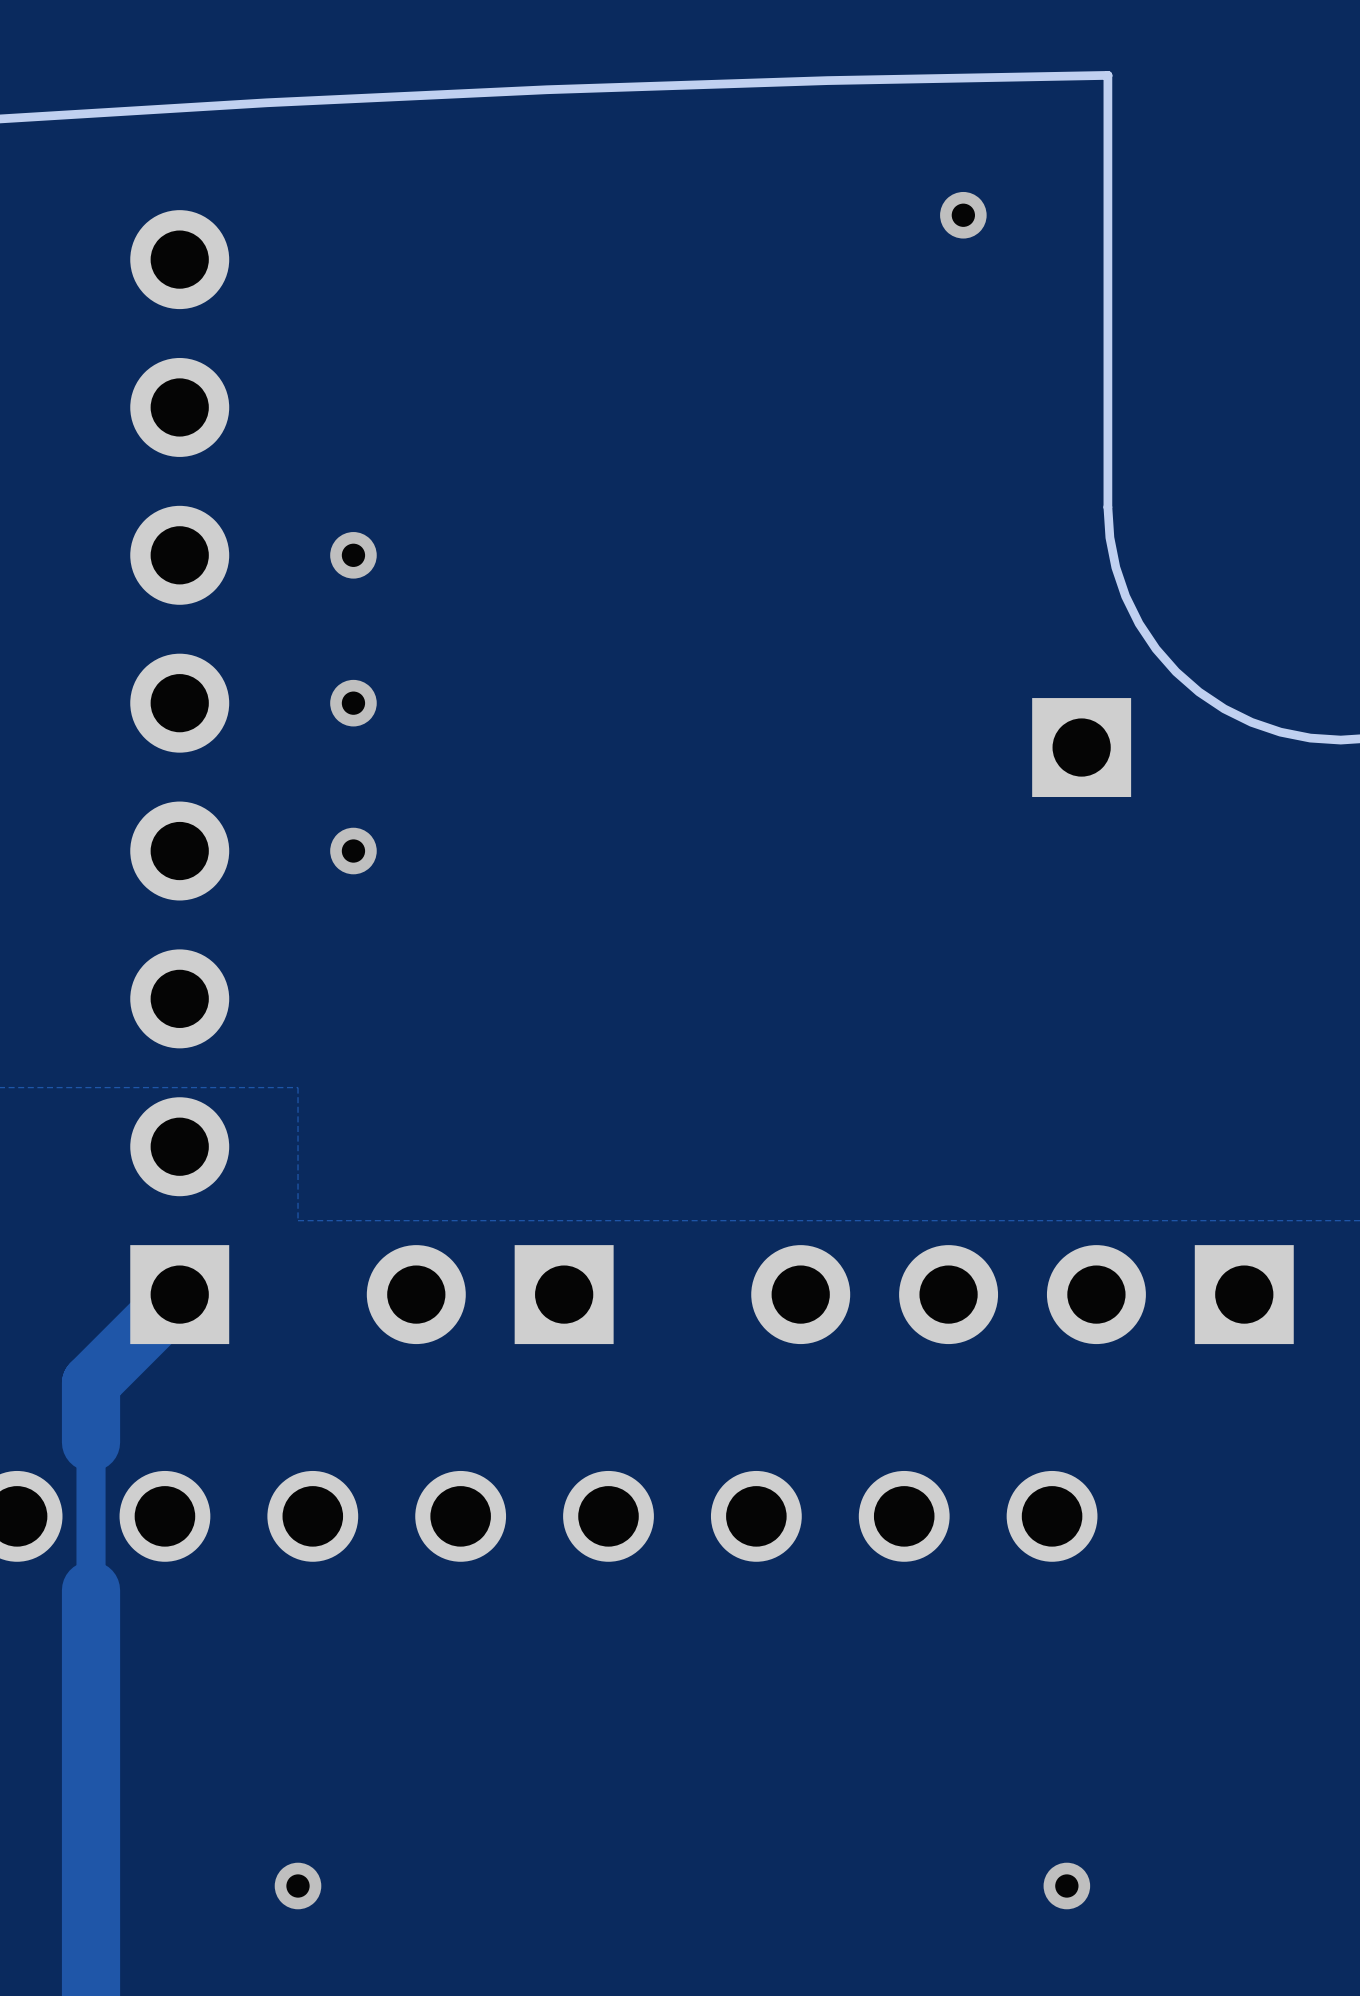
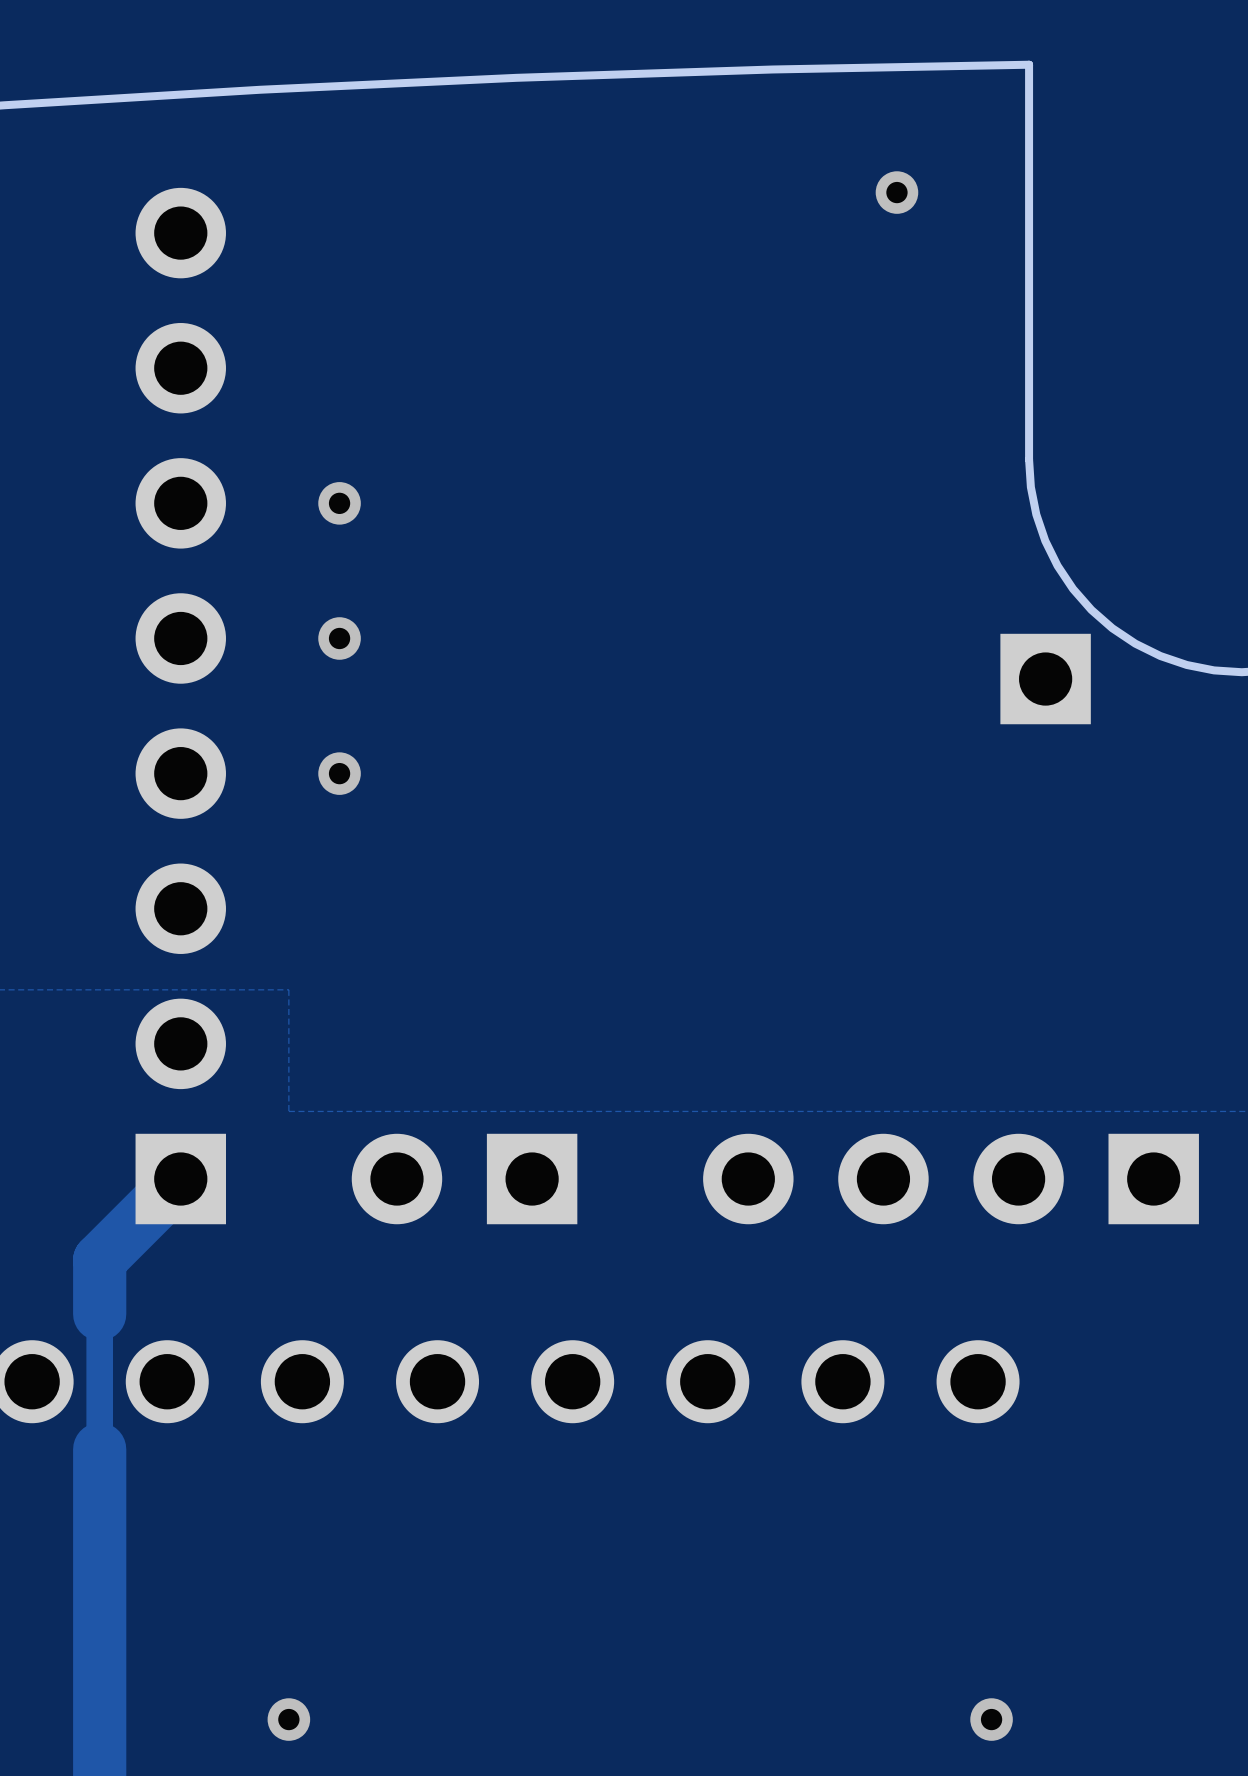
part position: (1081, 747) -> (1045, 679)

